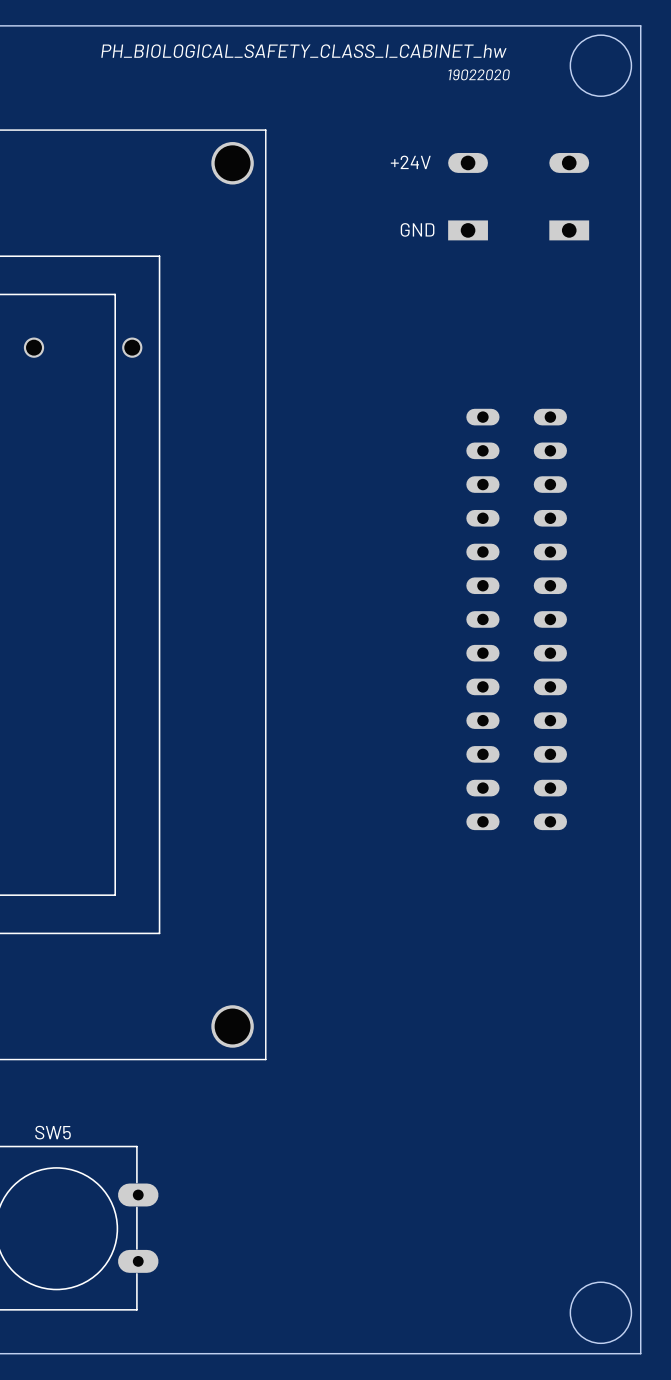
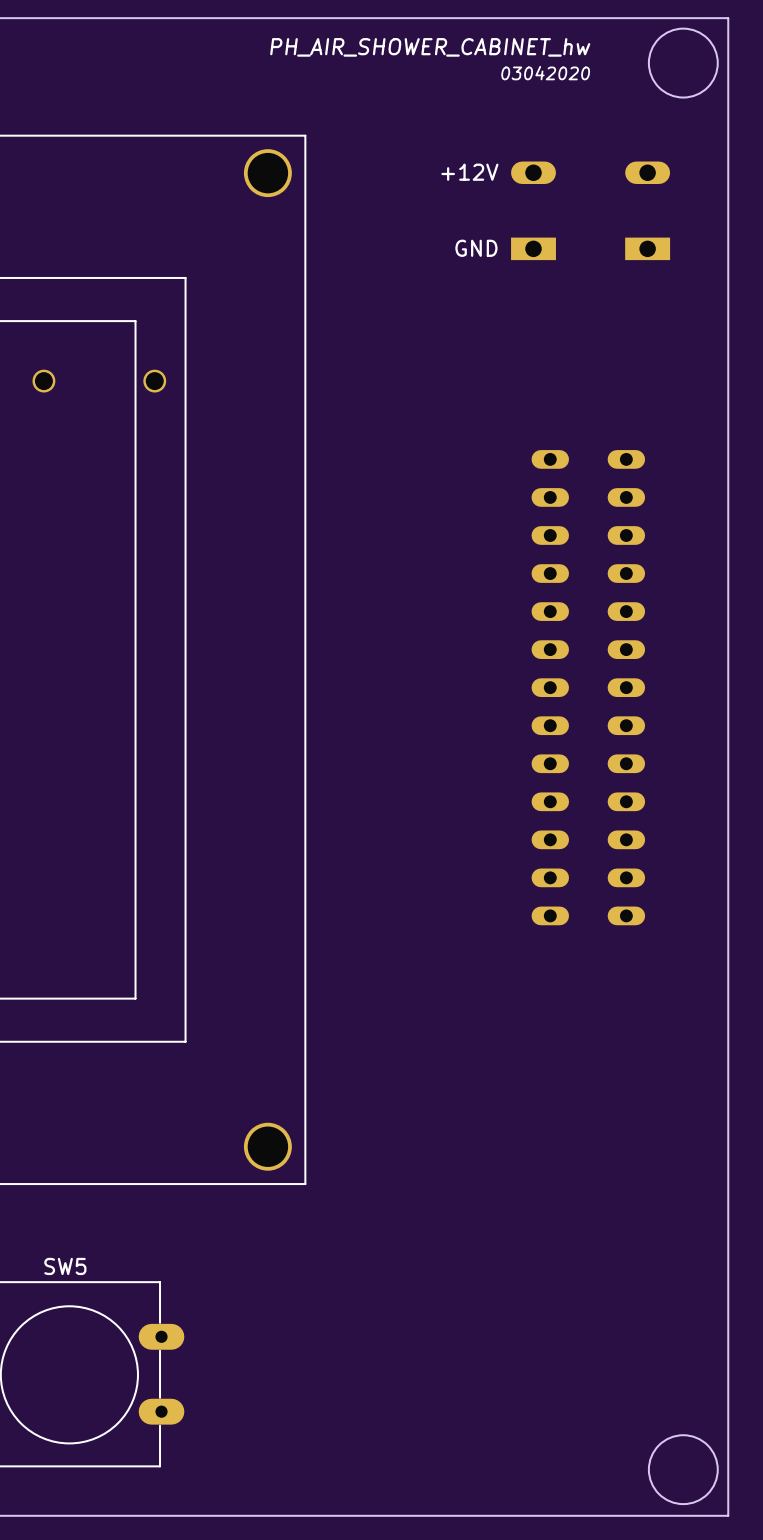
text: PH_BIOLOGICAL_SAFETY_CLASS_I_CABINET_hw (303, 51) -> none
text: none -> PH_AIR_SHOWER_CABINET_hw (430, 47)
text: 19022020 (479, 74) -> 03042020 (545, 73)
text: +24V (410, 162) -> +12V (469, 172)

